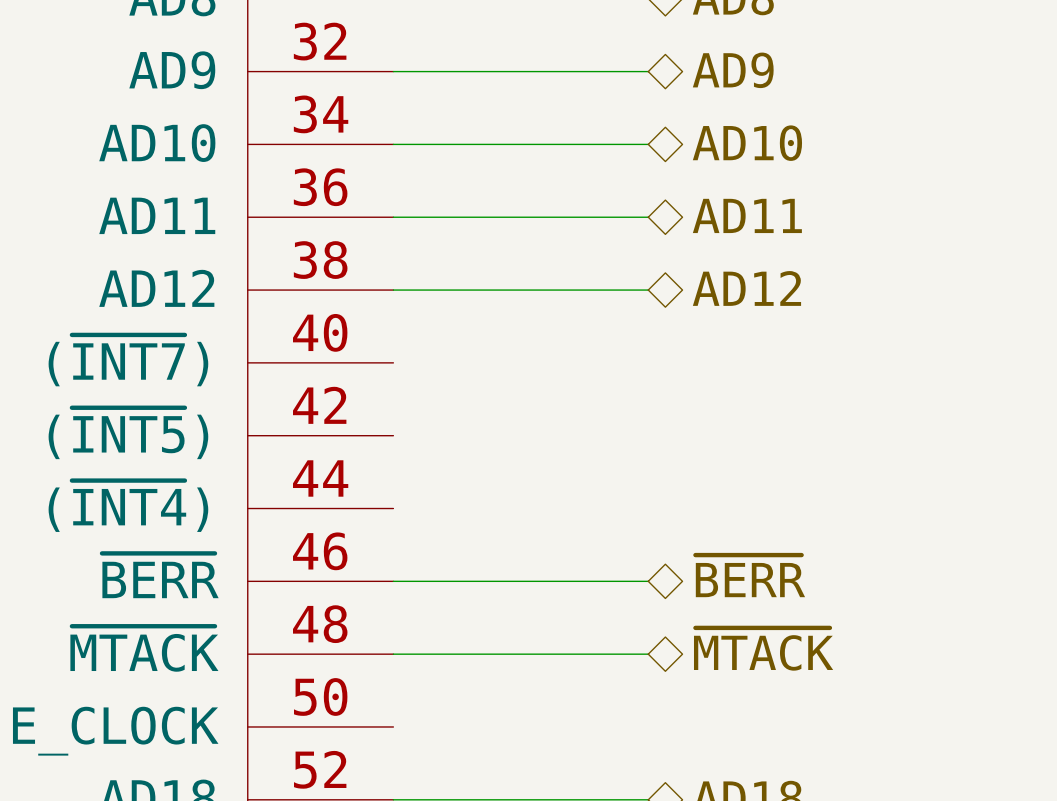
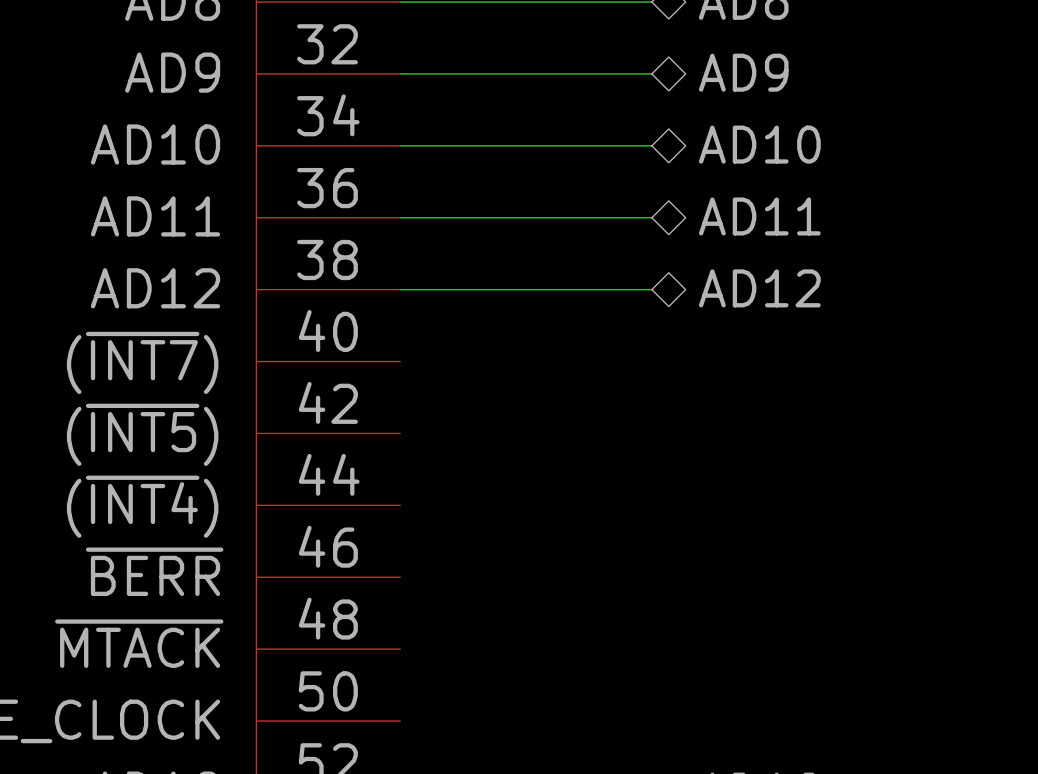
hierarchical label: ~{BERR} (750, 576) -> none
wire: (393, 581) (648, 581) -> none
hierarchical label: ~{MTACK} (763, 649) -> none
wire: (393, 654) (648, 654) -> none

